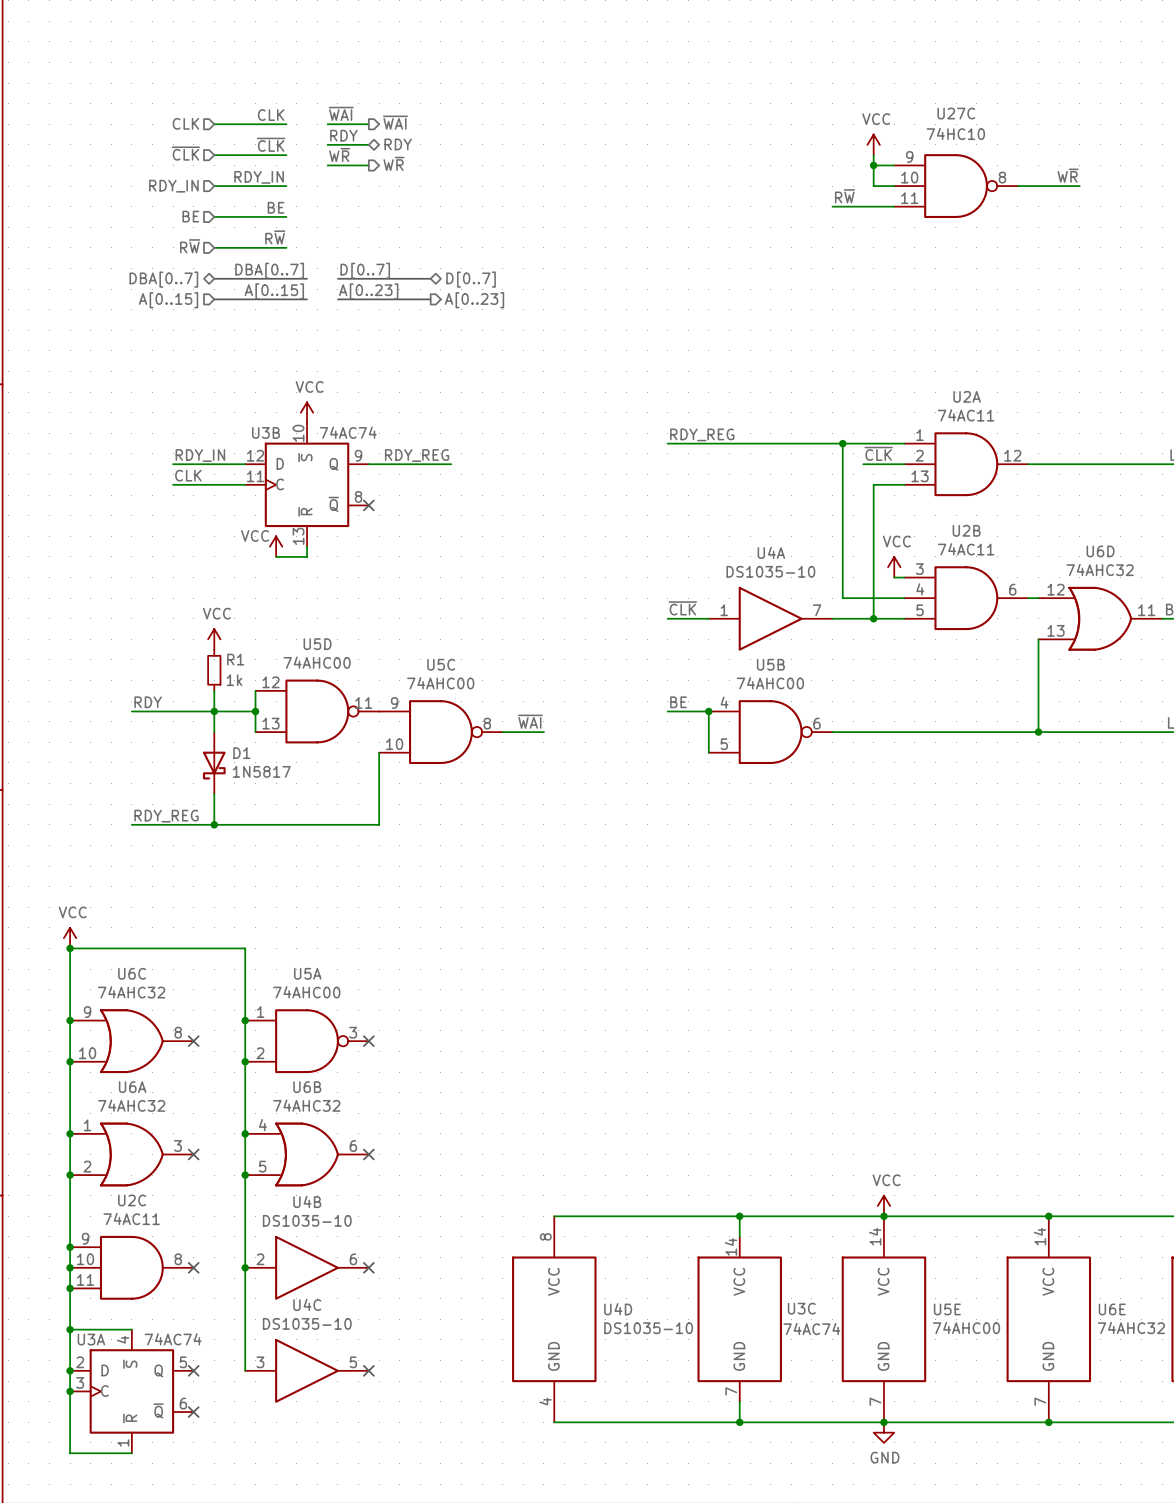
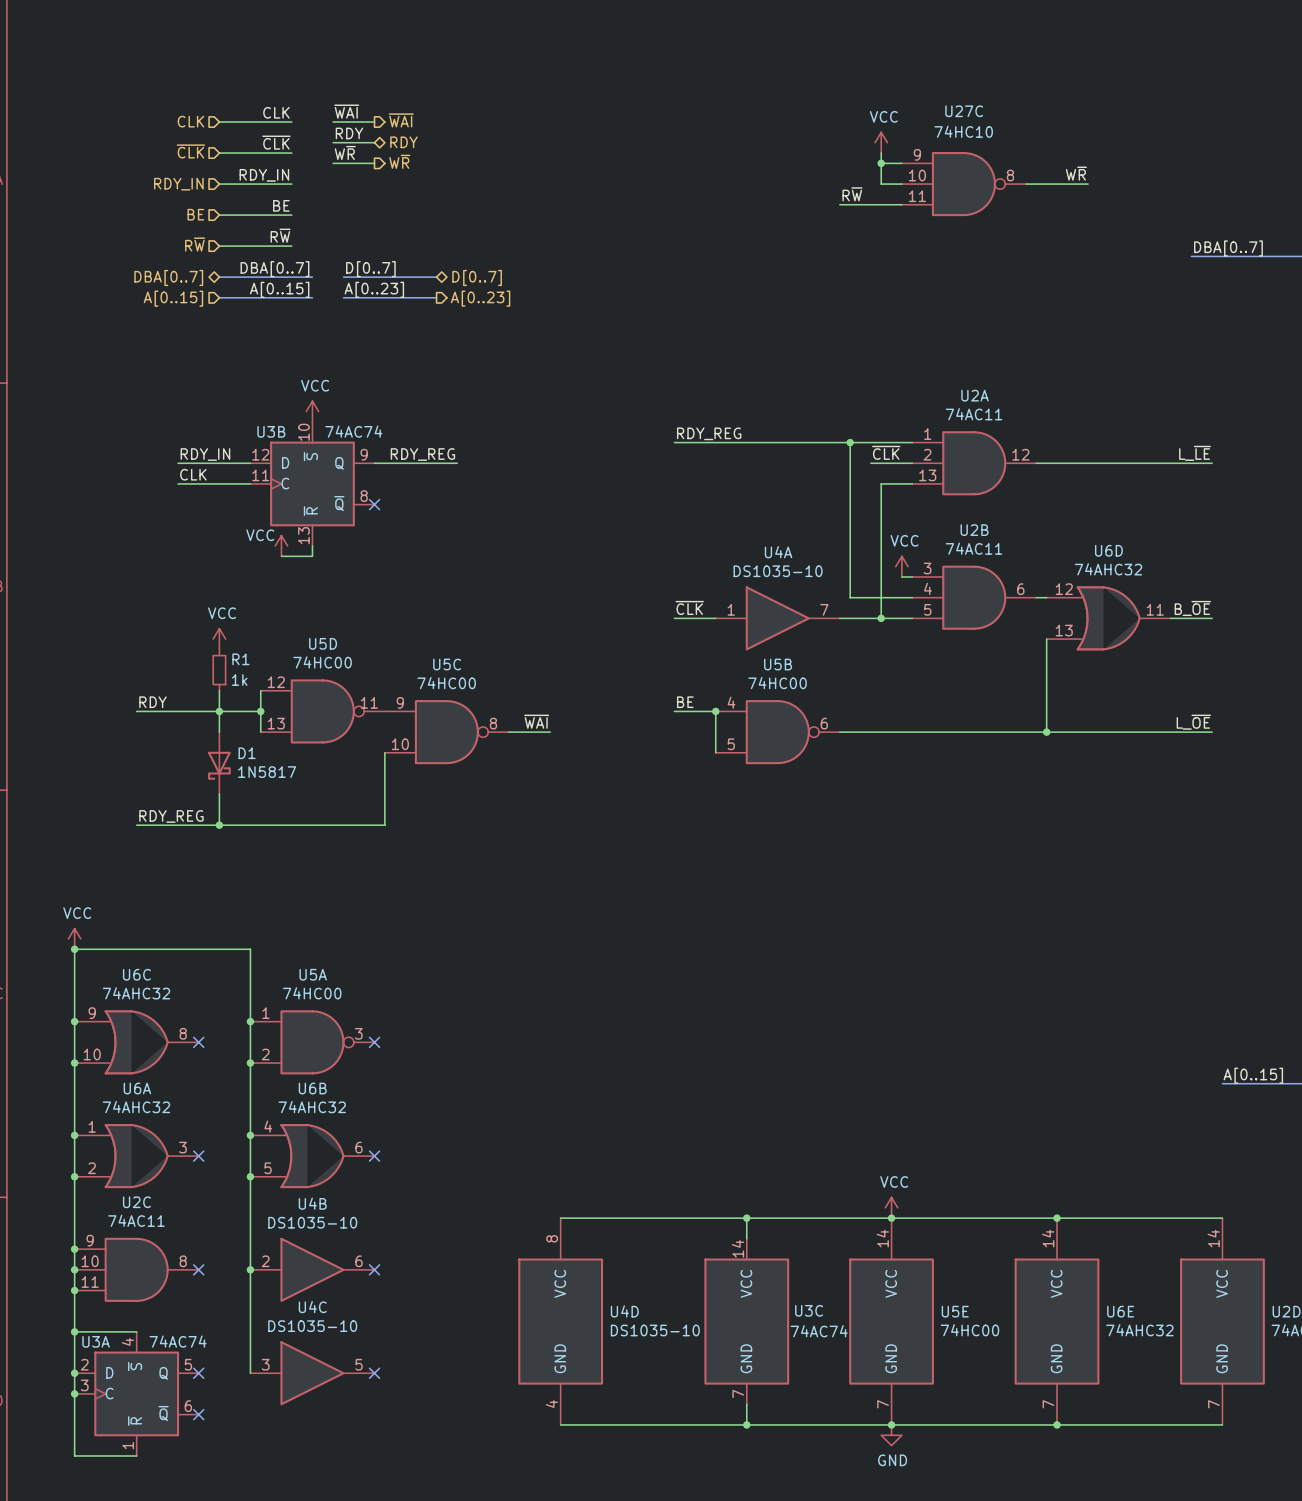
U5D value: 74AHC00 (317, 662) -> 74HC00 (322, 662)
U5C value: 74AHC00 (440, 683) -> 74HC00 (446, 683)
U5B value: 74AHC00 (770, 683) -> 74HC00 (777, 683)
U5A value: 74AHC00 (306, 992) -> 74HC00 (312, 993)
U5E value: 74AHC00 (966, 1327) -> 74HC00 (969, 1330)

